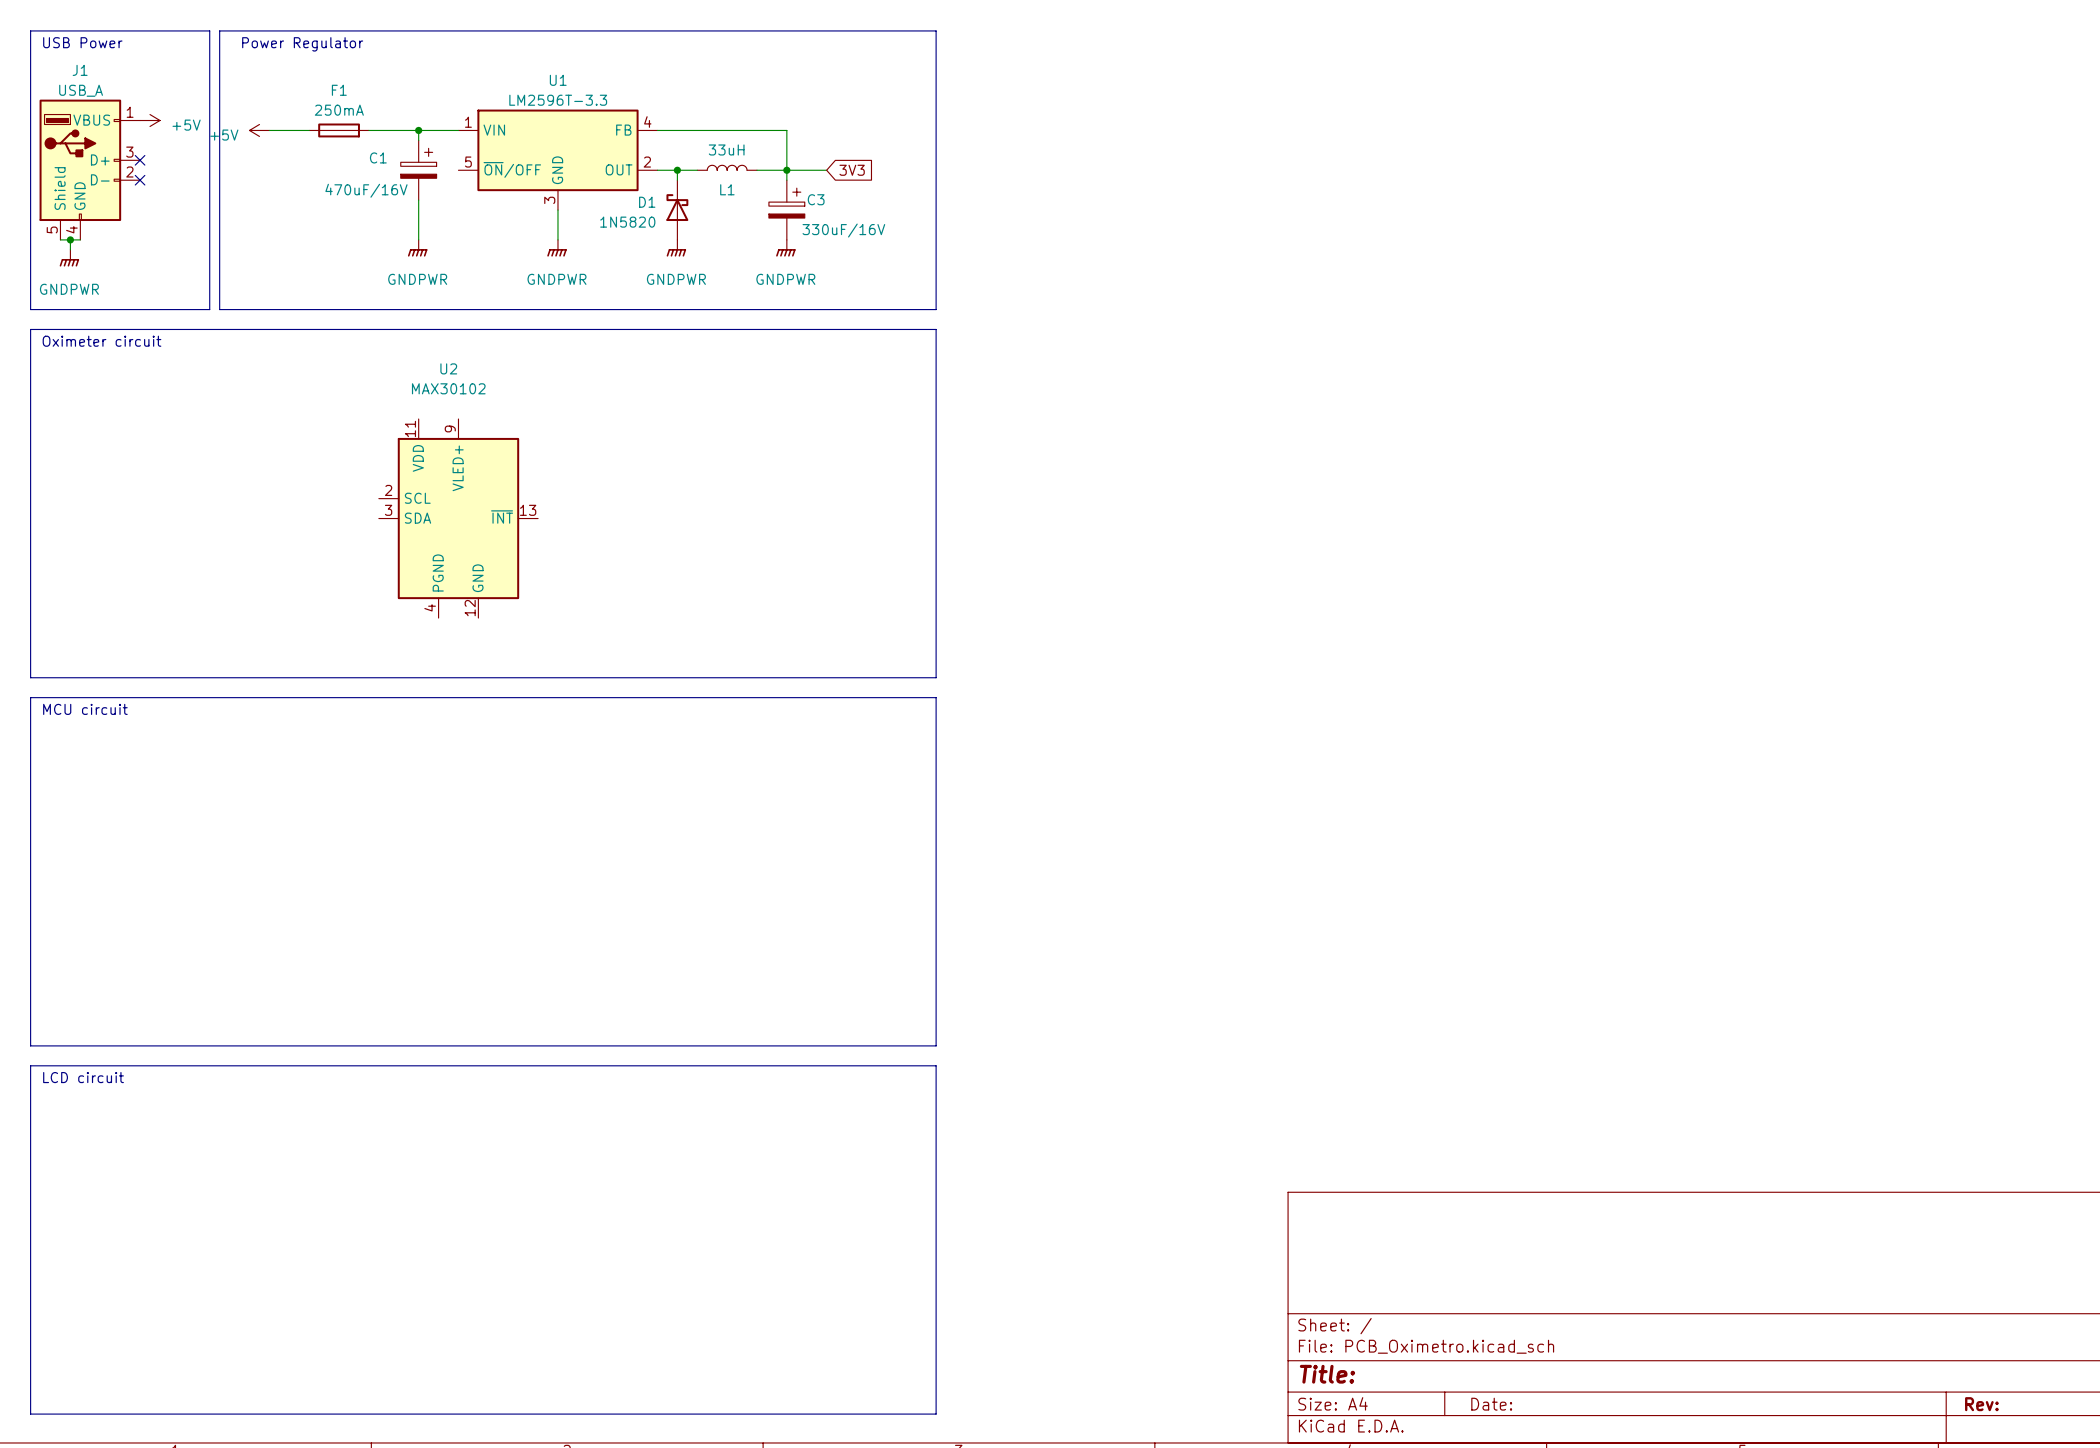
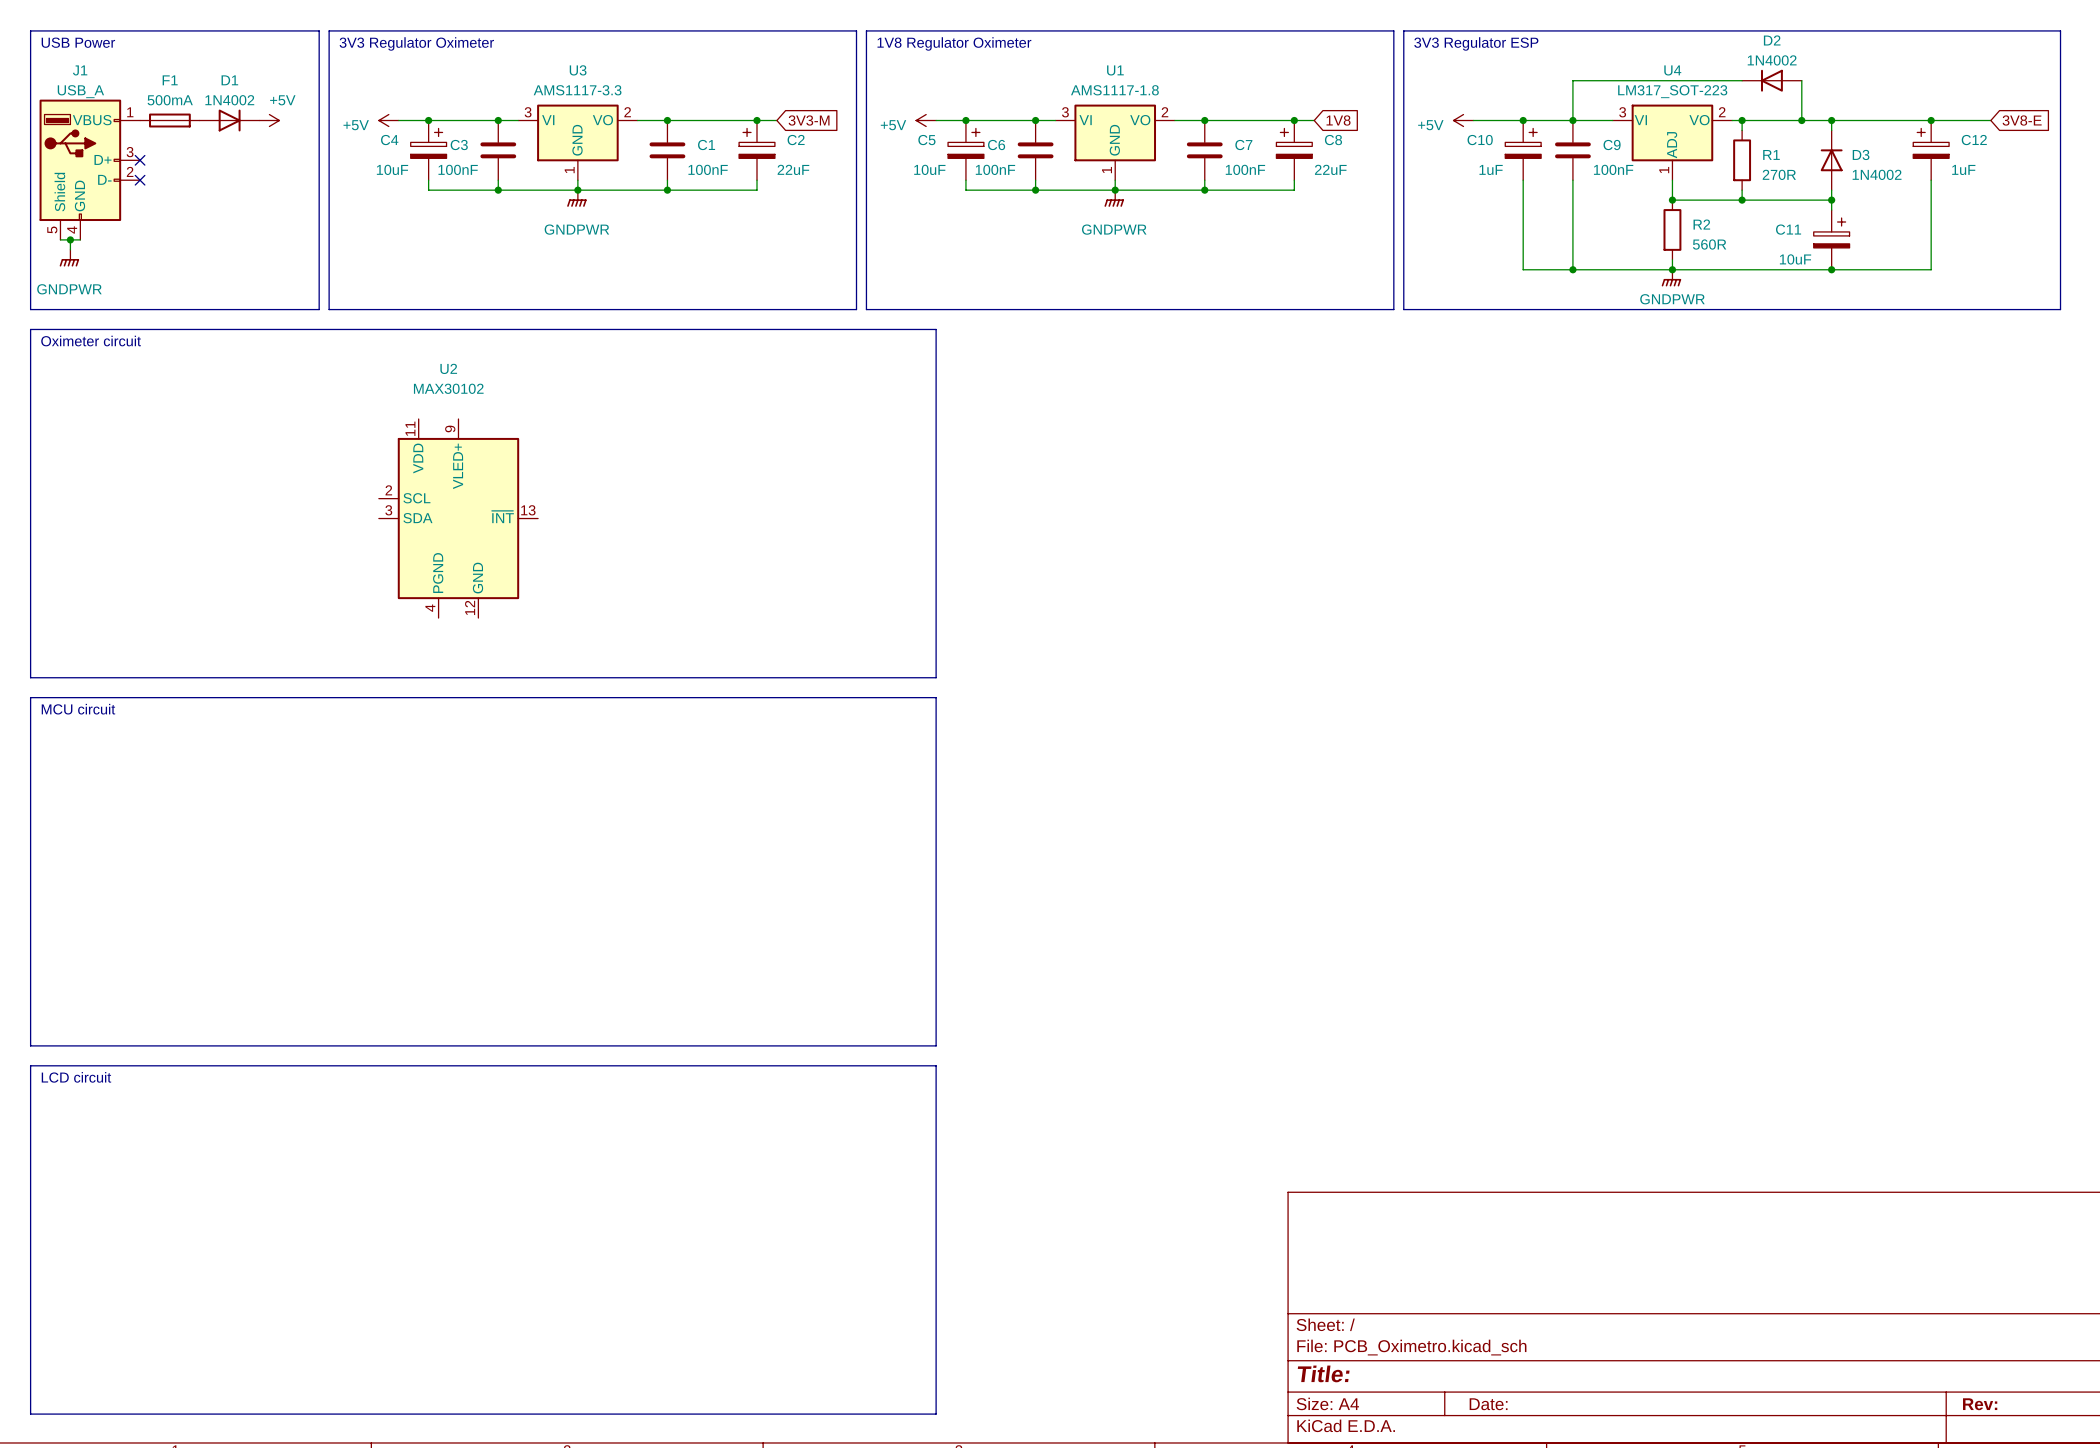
line: (209, 30) (209, 309) -> (209, 30) (219, 30)
line: (219, 30) (219, 309) -> (209, 309) (219, 309)
line: (319, 30) (329, 30) -> (319, 30) (319, 309)
line: (856, 30) (866, 30) -> (856, 30) (856, 309)
line: (936, 30) (936, 309) -> (936, 30) (1393, 30) (1393, 309) (936, 309)
line: none -> (1403, 30) (2060, 30) (2060, 309) (1403, 309) (1403, 30)
text: Power Regulator (302, 44) -> none
text: none -> 3V3 Regulator Oximeter (416, 43)
text: none -> 1V8 Regulator Oximeter (954, 43)
text: none -> 3V3 Regulator ESP (1476, 43)
wire: none -> (1742, 80) (1572, 80) (1572, 120)
D2: none -> 1N4002 (1771, 80)
wire: none -> (1801, 80) (1801, 120)
U1 value: LM2596T-3.3 (558, 100) -> AMS1117-1.8 (1114, 90)
U1 symbol: [458, 109, 658, 211] -> [1055, 104, 1175, 181]
F1 value: 250mA (339, 110) -> 500mA (170, 100)
power symbol: +5V (150, 120) -> none
power symbol: none -> +5V (388, 120)
wire: none -> (398, 120) (518, 120)
junction: none -> (498, 120)
wire: none -> (637, 120) (776, 120)
junction: none -> (667, 120)
junction: none -> (756, 120)
global label: none -> 3V3-M (809, 120)
power symbol: none -> +5V (926, 120)
wire: none -> (936, 120) (1055, 120)
junction: none -> (965, 120)
junction: none -> (1035, 120)
wire: none -> (1174, 120) (1314, 120)
junction: none -> (1204, 120)
junction: none -> (1294, 120)
global label: none -> 1V8 (1338, 120)
power symbol: none -> +5V (1463, 120)
wire: none -> (1473, 120) (1612, 120)
junction: none -> (1523, 120)
junction: none -> (1572, 120)
wire: none -> (1732, 120) (1990, 120)
wire: none -> (1742, 120) (1742, 130)
junction: none -> (1742, 120)
junction: none -> (1801, 120)
wire: none -> (1831, 120) (1831, 130)
junction: none -> (1831, 120)
junction: none -> (1931, 120)
global label: none -> 3V8-E (2022, 120)
power symbol rotation: 0° (259, 130) -> 180° (269, 120)
power symbol position: +5V (259, 130) -> +5V (269, 120)
wire: (269, 130) (309, 130) -> none
F1 position: (339, 130) -> (169, 120)
wire: (368, 130) (458, 130) -> none
junction position: (418, 130) -> (428, 120)
wire: (657, 130) (786, 130) (786, 180) -> none
power symbol text position: +5V (224, 135) -> +5V (282, 100)
C1 symbol: [400, 140, 437, 201] -> [649, 120, 686, 181]
U3: none -> AMS1117-3.3 (577, 142)
U4: none -> LM317_SOT-223 (1672, 142)
C4: none -> 10uF (428, 150)
C2: none -> 22uF (756, 150)
C5: none -> 10uF (965, 150)
C6: none -> 100nF (1035, 150)
C7: none -> 100nF (1204, 150)
C8: none -> 22uF (1294, 150)
C10: none -> 1uF (1523, 150)
C9: none -> 100nF (1572, 150)
C12: none -> 1uF (1931, 150)
C1 name position: C1 (378, 157) -> C1 (706, 145)
R1: none -> 270R (1742, 160)
D3: none -> 1N4002 (1831, 160)
L1: 33uH (727, 167) -> none
wire: (657, 170) (697, 170) -> none
wire: (677, 170) (677, 180) -> (667, 180) (667, 190)
junction position: (677, 170) -> (667, 190)
wire: (756, 170) (826, 170) -> none
junction: (786, 170) -> none
global label: 3V3 (852, 170) -> none
wire: none -> (428, 180) (428, 190) (756, 190) (756, 180)
D1 symbol: [666, 180, 689, 240] -> [199, 109, 260, 132]
C3 symbol: [768, 180, 805, 240] -> [480, 120, 517, 181]
wire: none -> (965, 180) (965, 190) (1294, 190) (1294, 180)
wire: none -> (1035, 180) (1035, 190)
wire: none -> (1115, 180) (1115, 190)
wire: none -> (1204, 180) (1204, 190)
wire: none -> (1523, 180) (1523, 269) (1931, 269) (1931, 180)
wire: none -> (1572, 180) (1572, 269)
wire: none -> (1672, 180) (1672, 200) (1831, 200)
C1 value: 470uF/16V (366, 190) -> 100nF (708, 169)
junction: none -> (498, 190)
junction: none -> (577, 190)
junction: none -> (1035, 190)
junction: none -> (1115, 190)
junction: none -> (1204, 190)
wire: none -> (1742, 190) (1742, 200)
wire: none -> (1831, 190) (1831, 210)
power symbol: none -> GNDPWR (1114, 198)
C3 name position: C3 (816, 199) -> C3 (459, 145)
wire: (418, 200) (418, 239) -> none
junction: none -> (1672, 200)
junction: none -> (1742, 200)
junction: none -> (1831, 200)
D1 name position: D1 (647, 202) -> D1 (229, 80)
wire: (557, 210) (557, 239) -> none
D1 value: 1N5820 (627, 222) -> 1N4002 (229, 100)
R2: none -> 560R (1672, 229)
C3 value: 330uF/16V (843, 230) -> 100nF (458, 169)
C11: none -> 10uF (1831, 239)
power symbol: GNDPWR (417, 248) -> none
power symbol position: GNDPWR (556, 248) -> GNDPWR (576, 198)
power symbol: GNDPWR (676, 248) -> none
power symbol: GNDPWR (785, 248) -> none
wire: none -> (1672, 259) (1672, 269)
junction: none -> (1572, 269)
junction: none -> (1672, 269)
junction: none -> (1831, 269)
power symbol: none -> GNDPWR (1671, 278)
line: (319, 309) (329, 309) -> (329, 30) (329, 309)
line: (856, 309) (866, 309) -> (866, 30) (866, 309)

